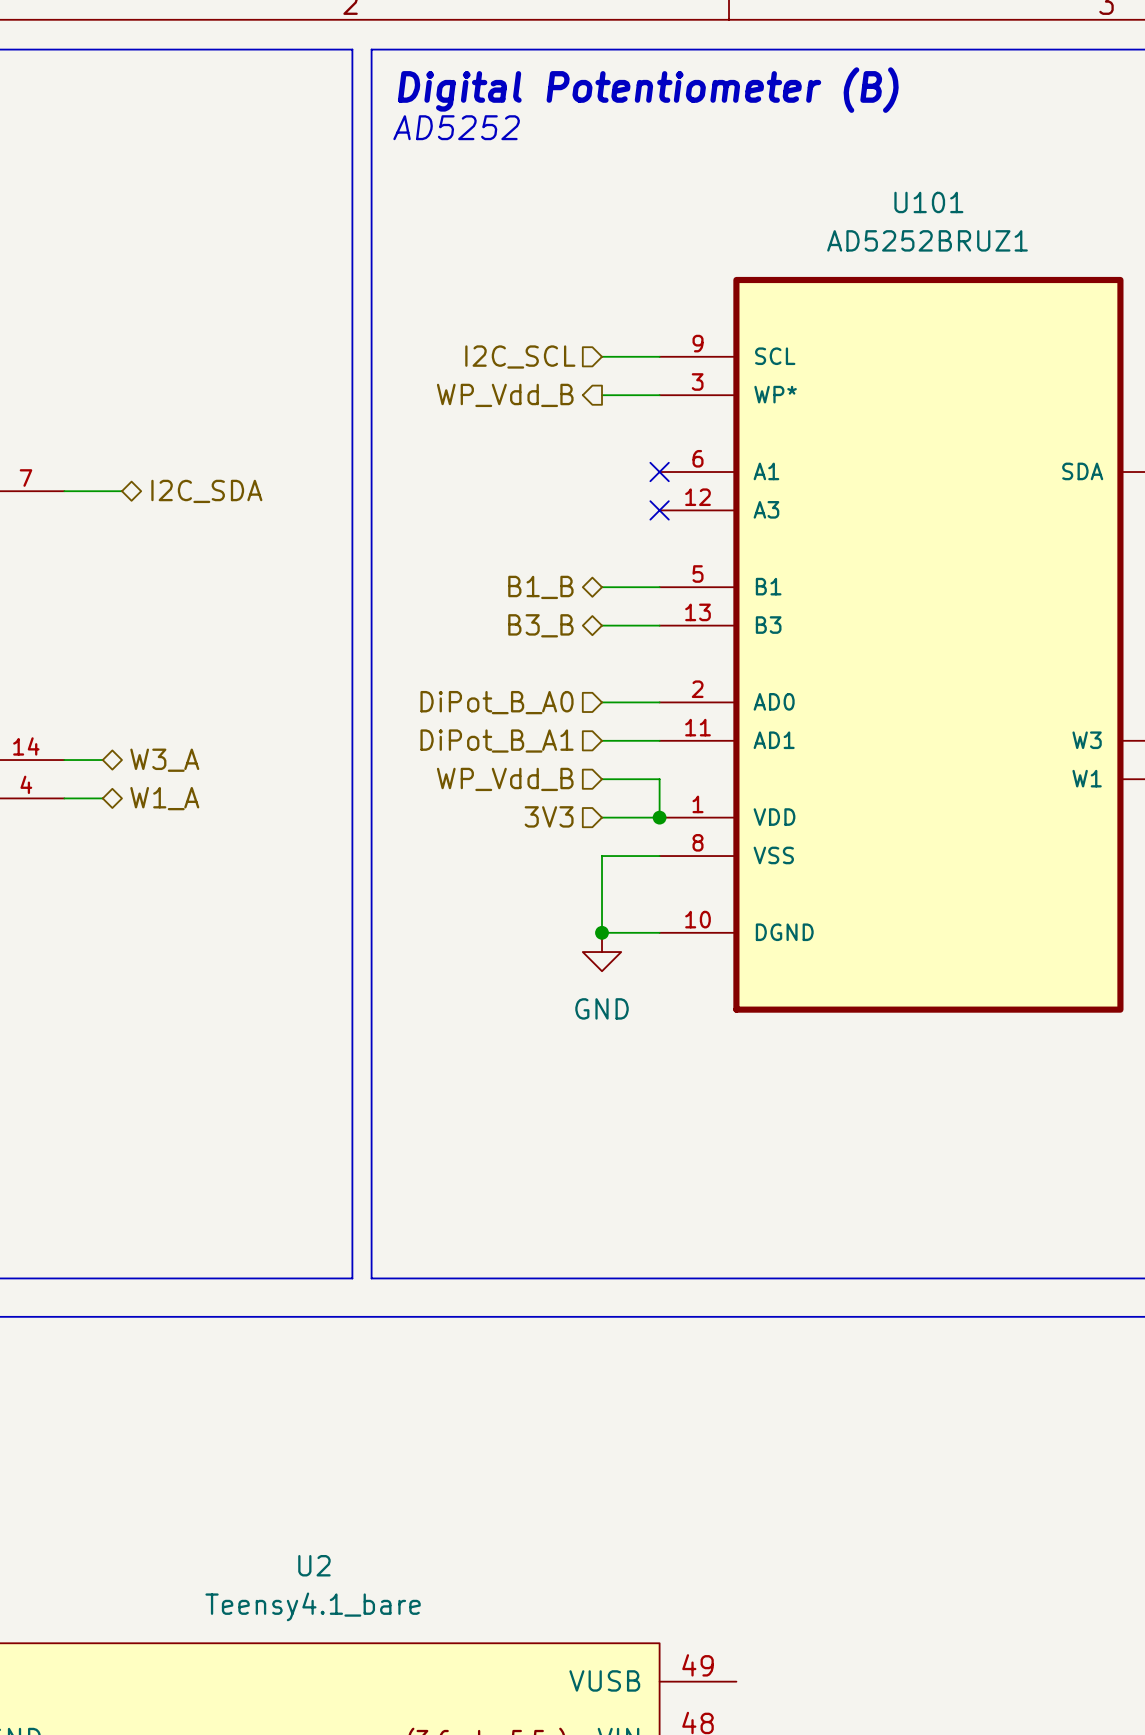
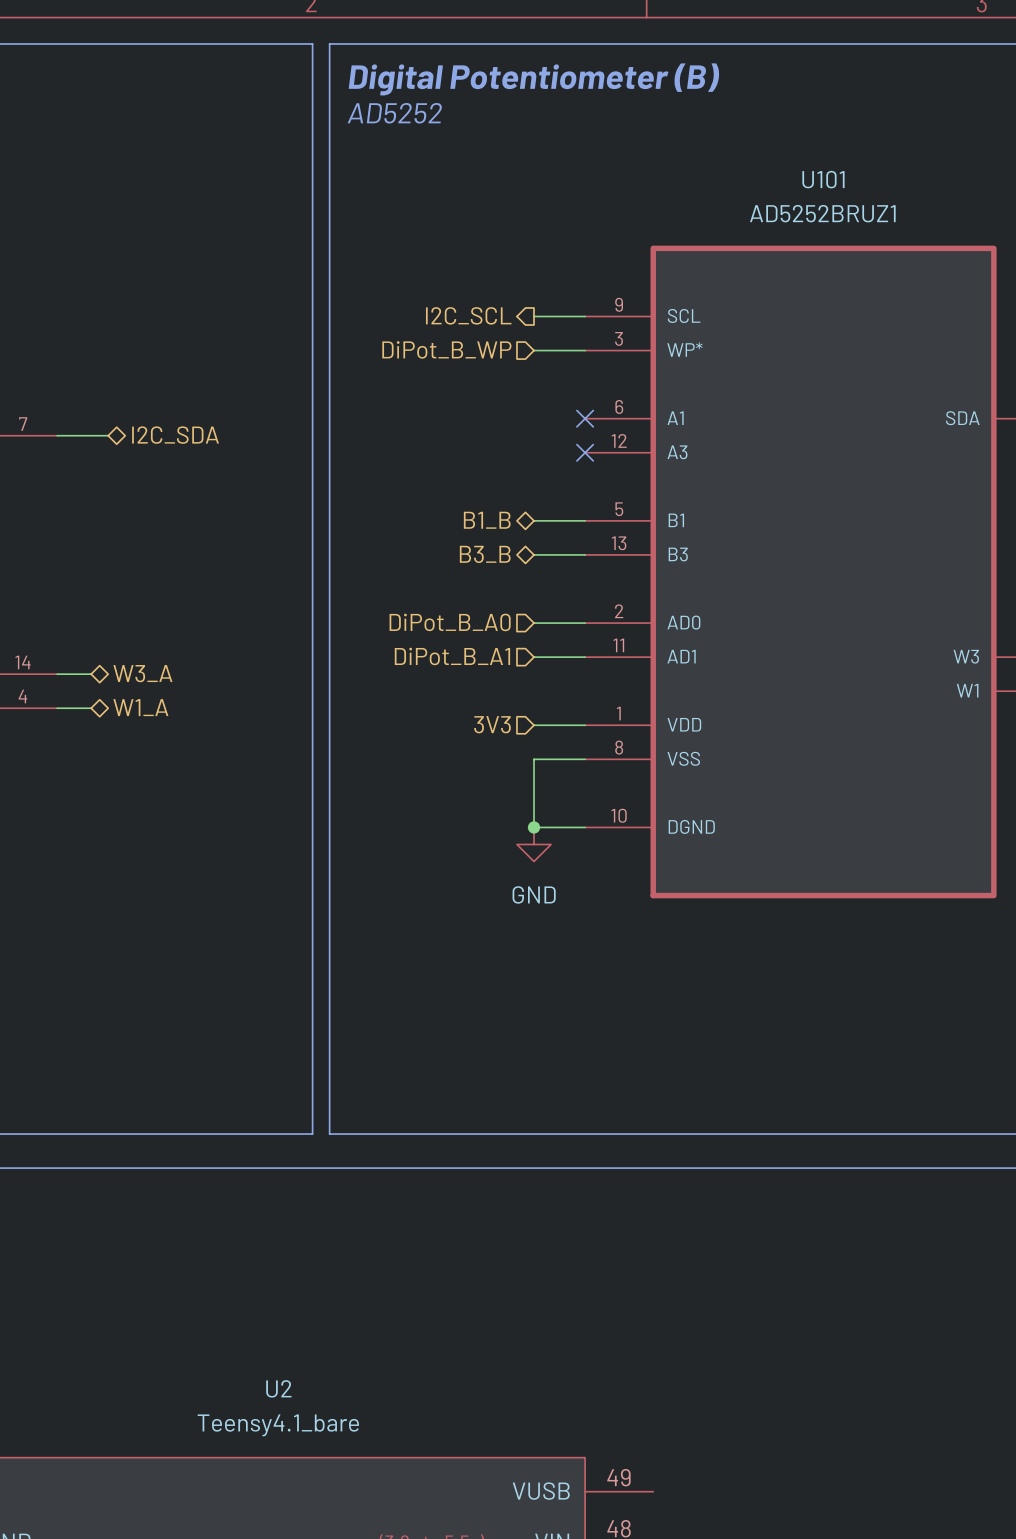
hierarchical label shape: input (520, 356) -> output (468, 315)
hierarchical label shape: output (505, 395) -> input (446, 349)
hierarchical label: WP_Vdd_B (505, 395) -> DiPot_B_WP (446, 349)
hierarchical label: WP_Vdd_B (505, 779) -> none
wire: (602, 779) (659, 779) (659, 817) -> none
junction: (659, 817) -> none

